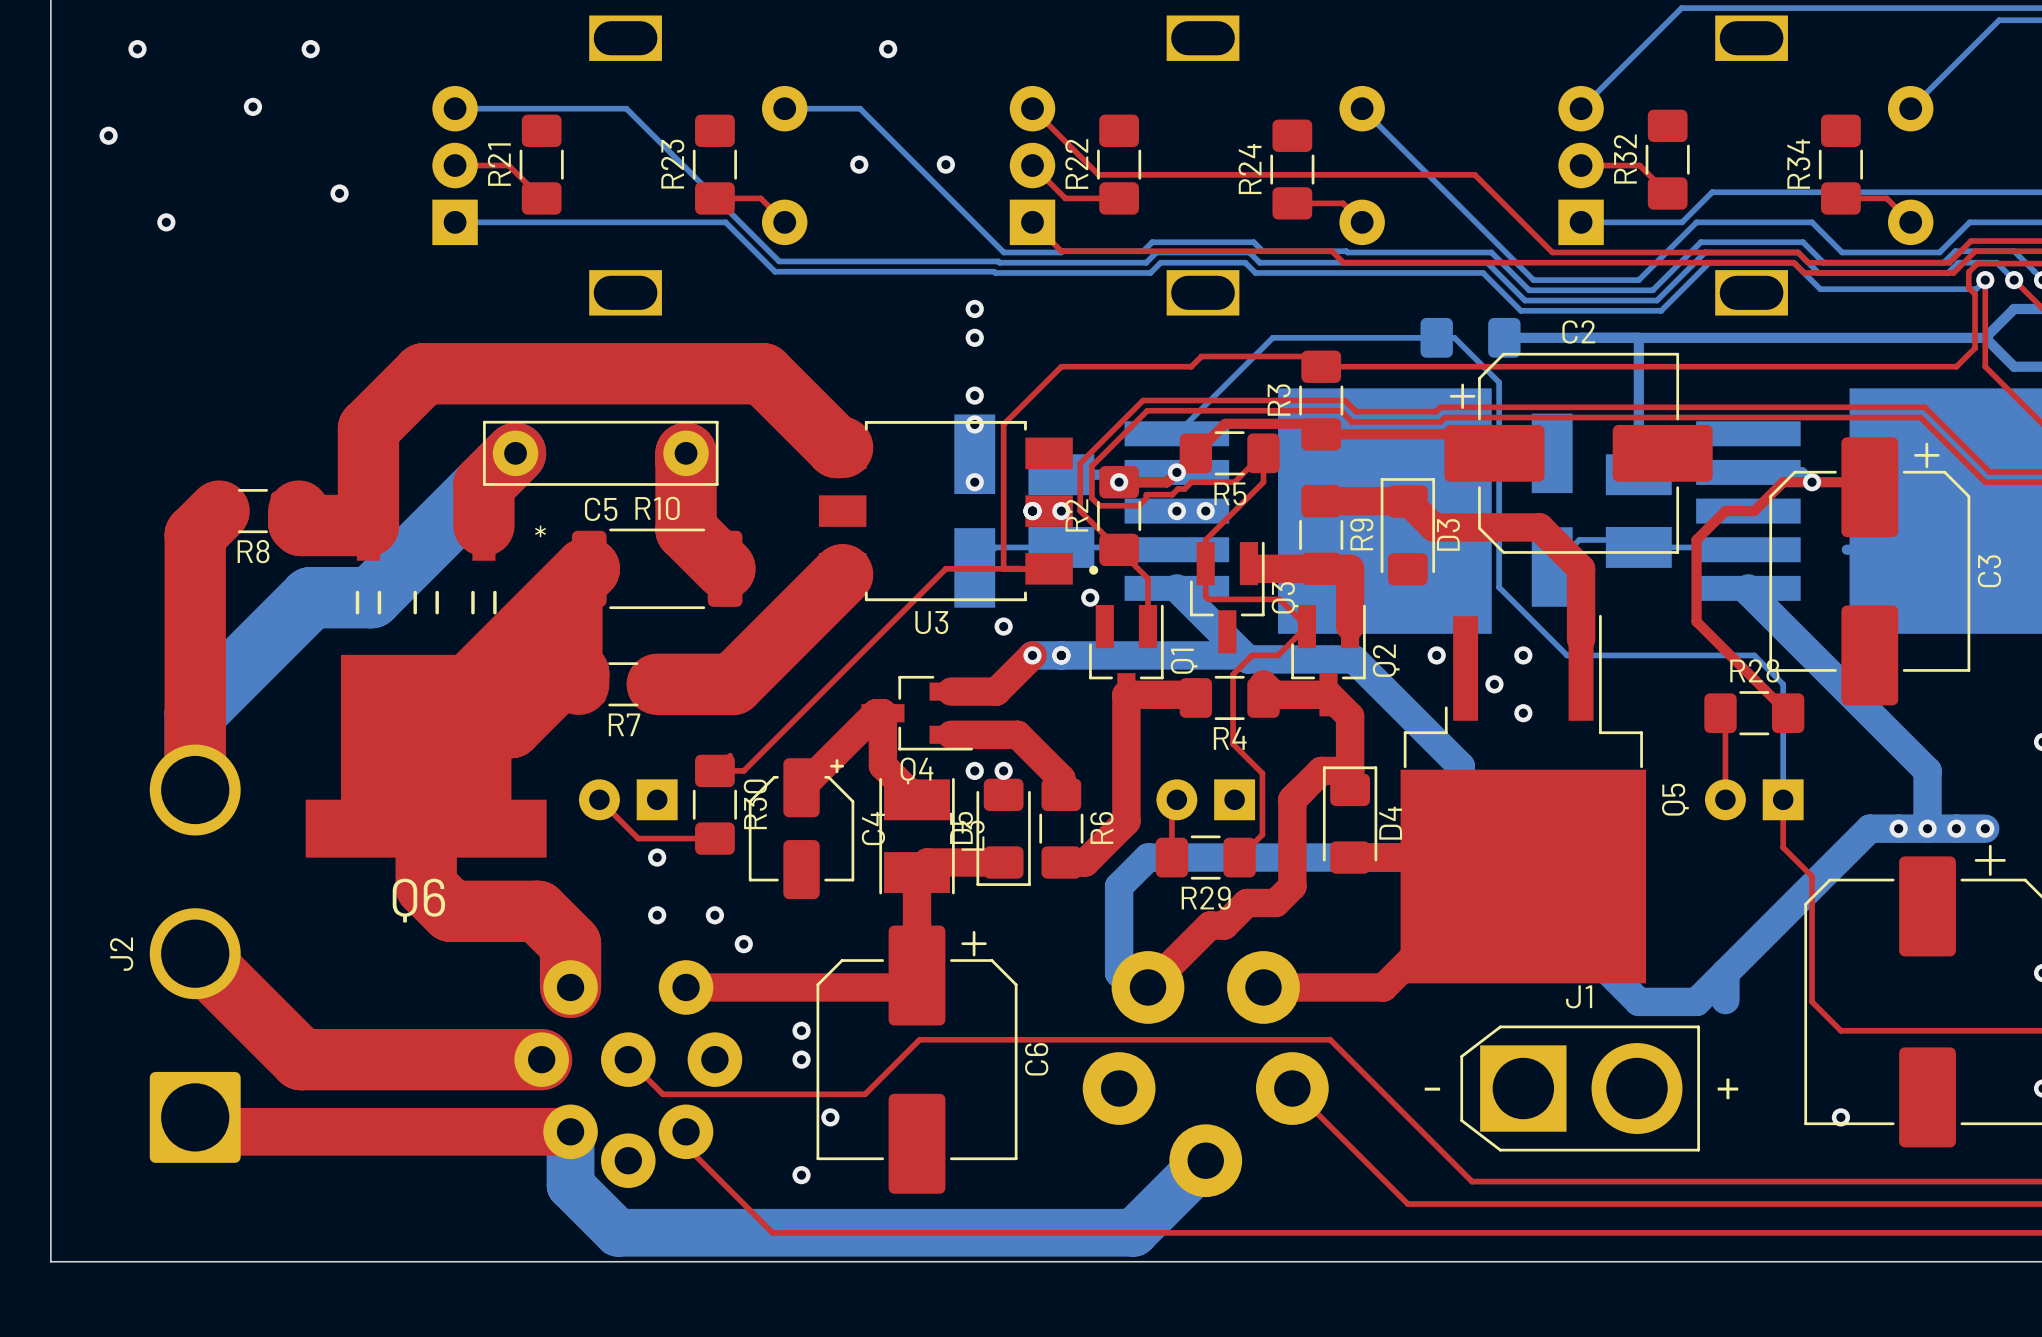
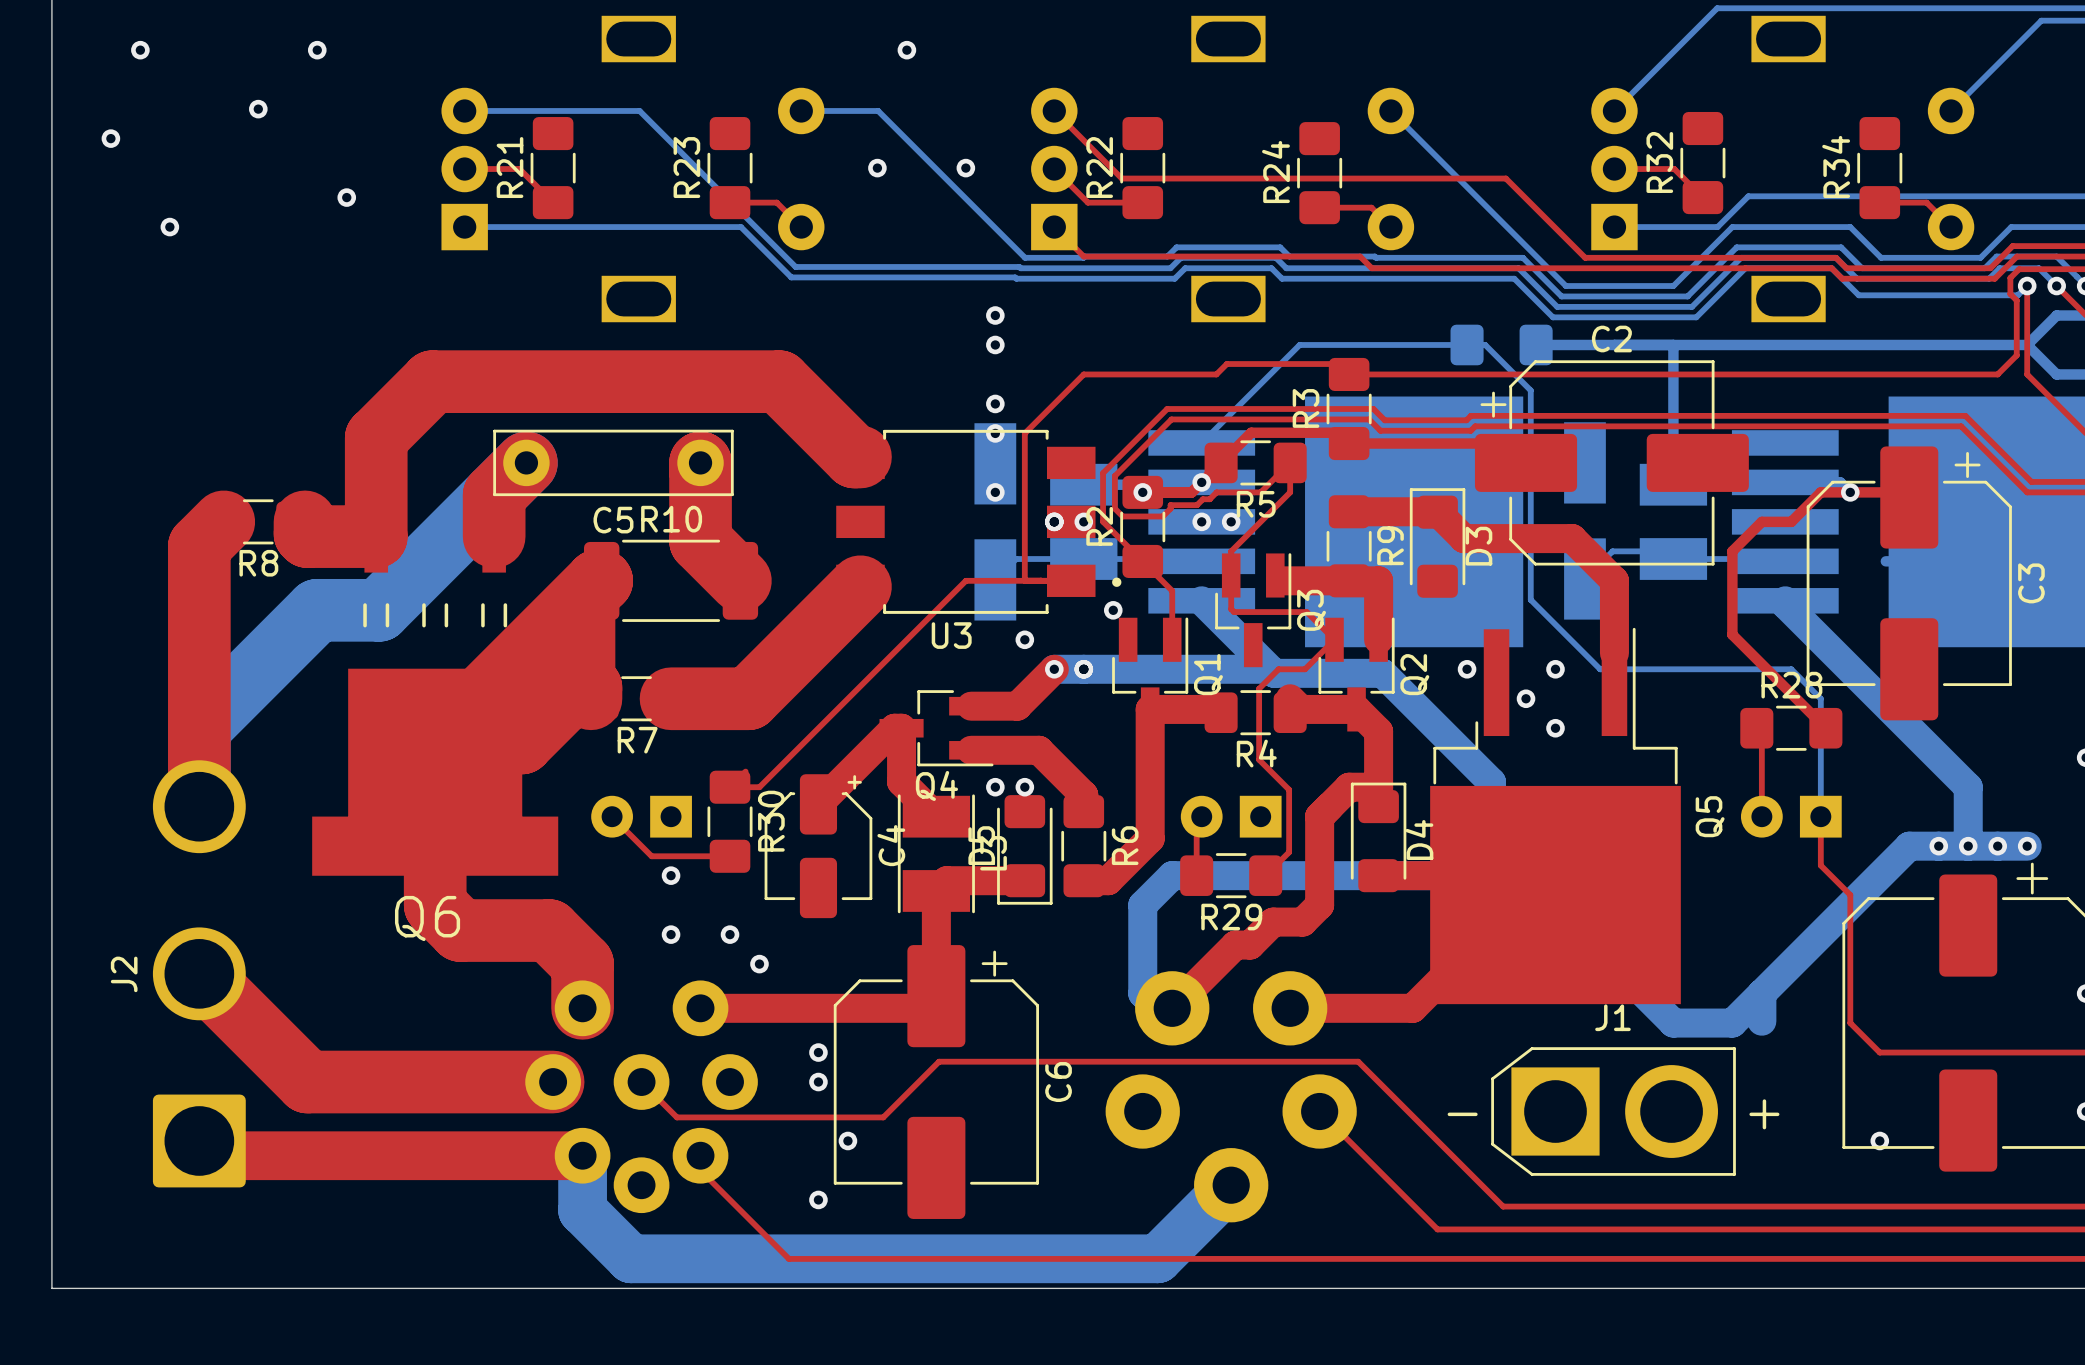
Q6 text: * (540, 531) -> none

